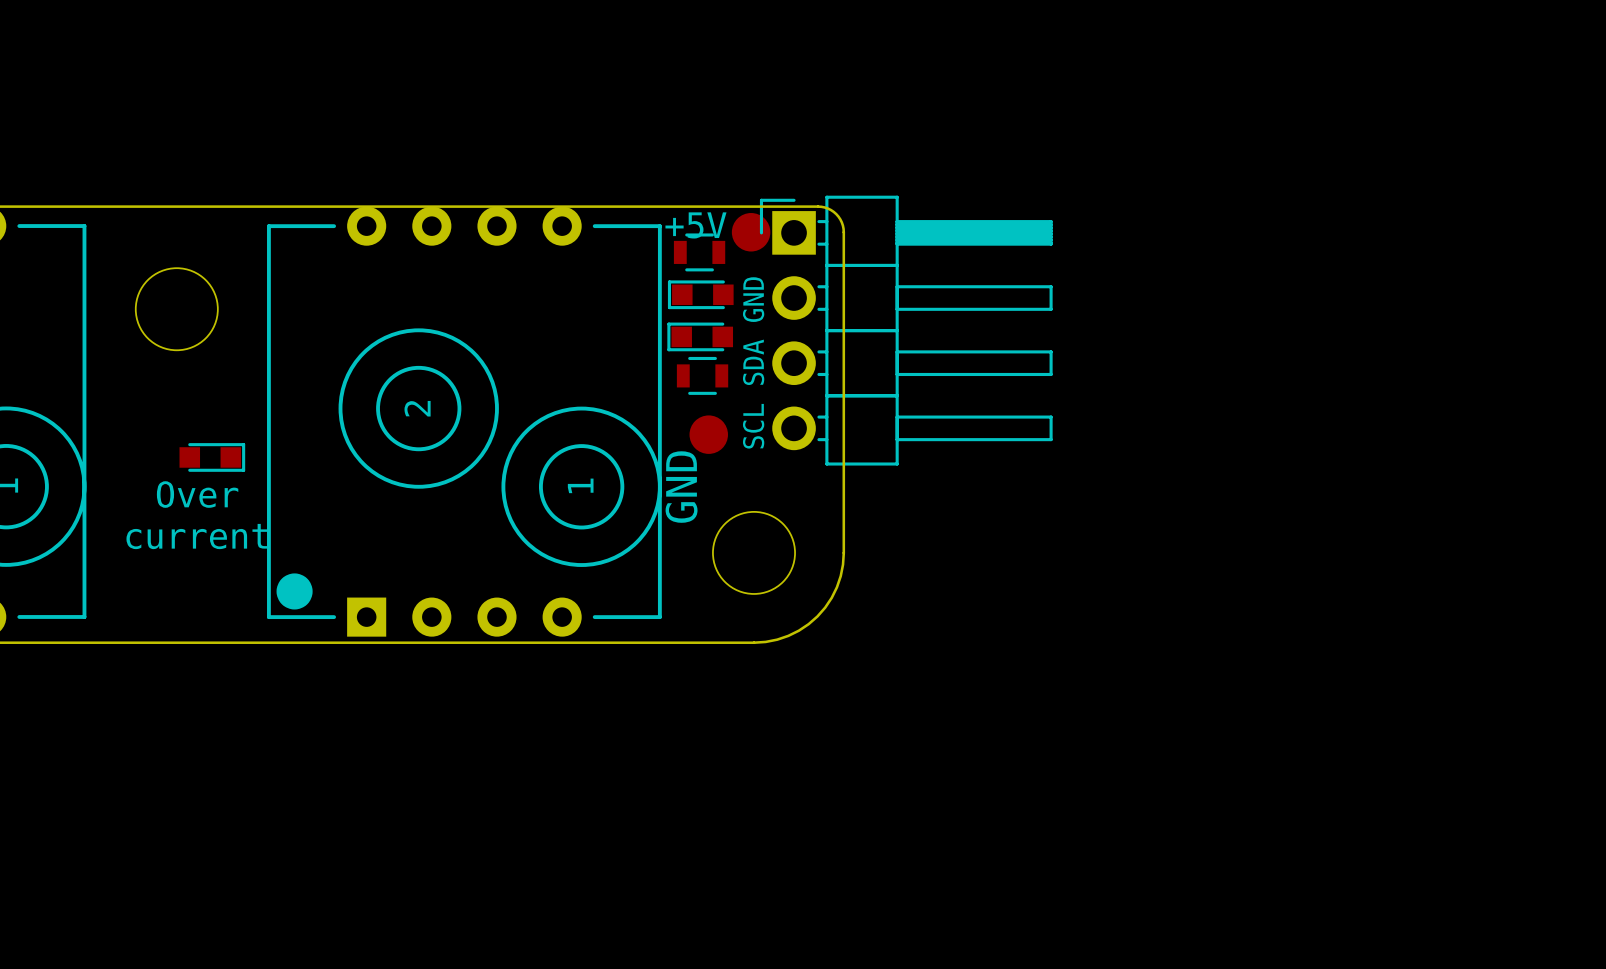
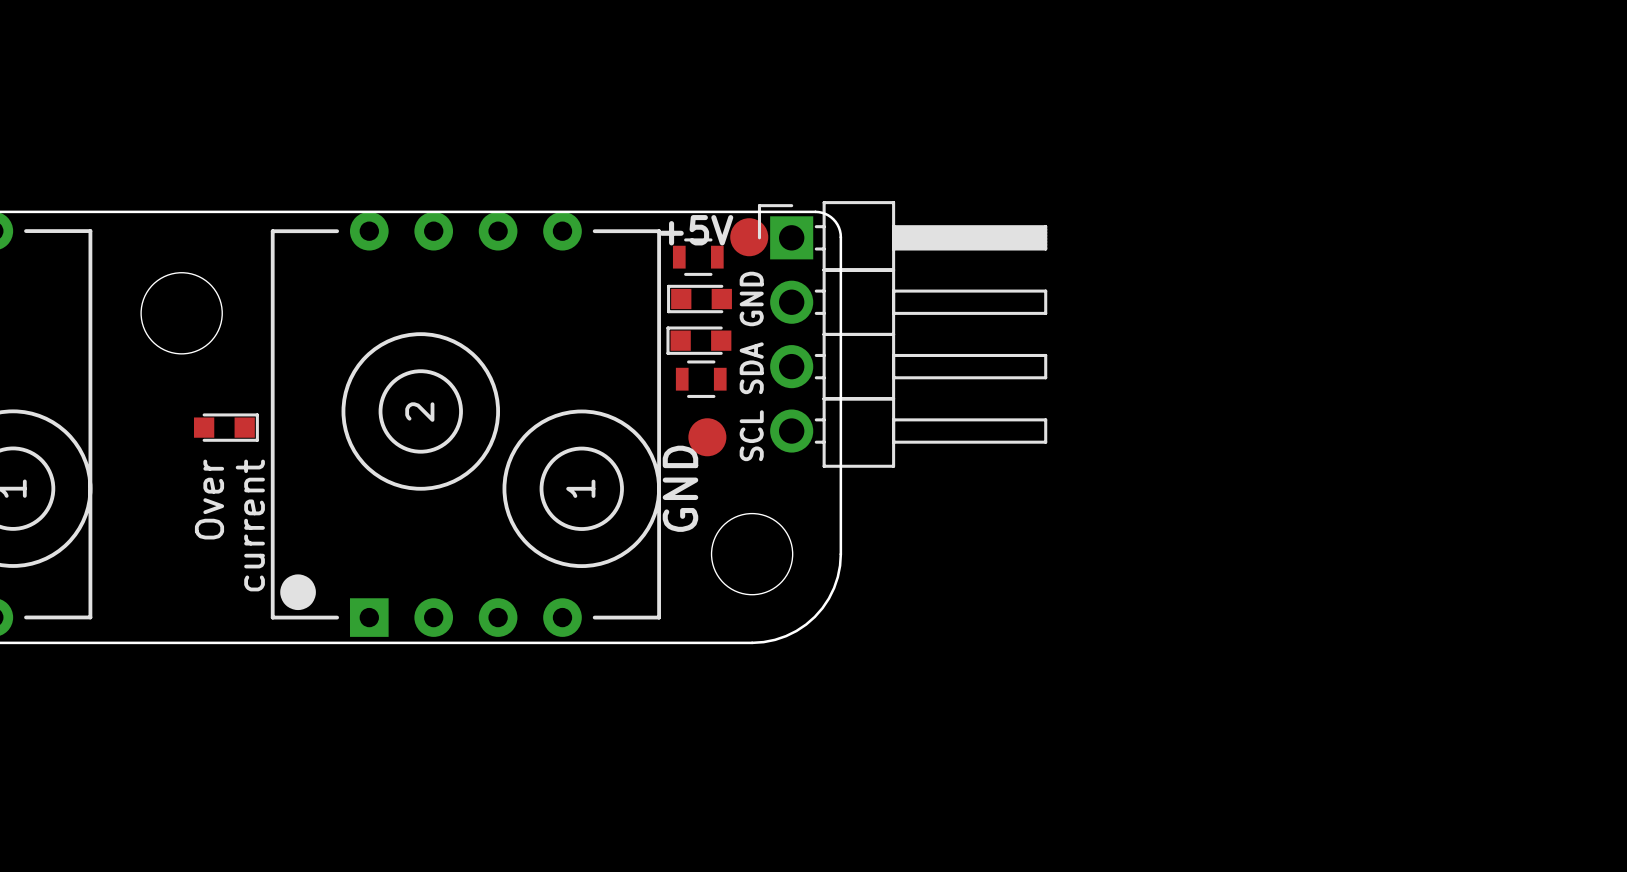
part position: (212, 457) -> (226, 427)
text rotation: 0° (197, 494) -> 90° counterclockwise (209, 499)
text rotation: 0° (197, 536) -> 90° counterclockwise (250, 525)

